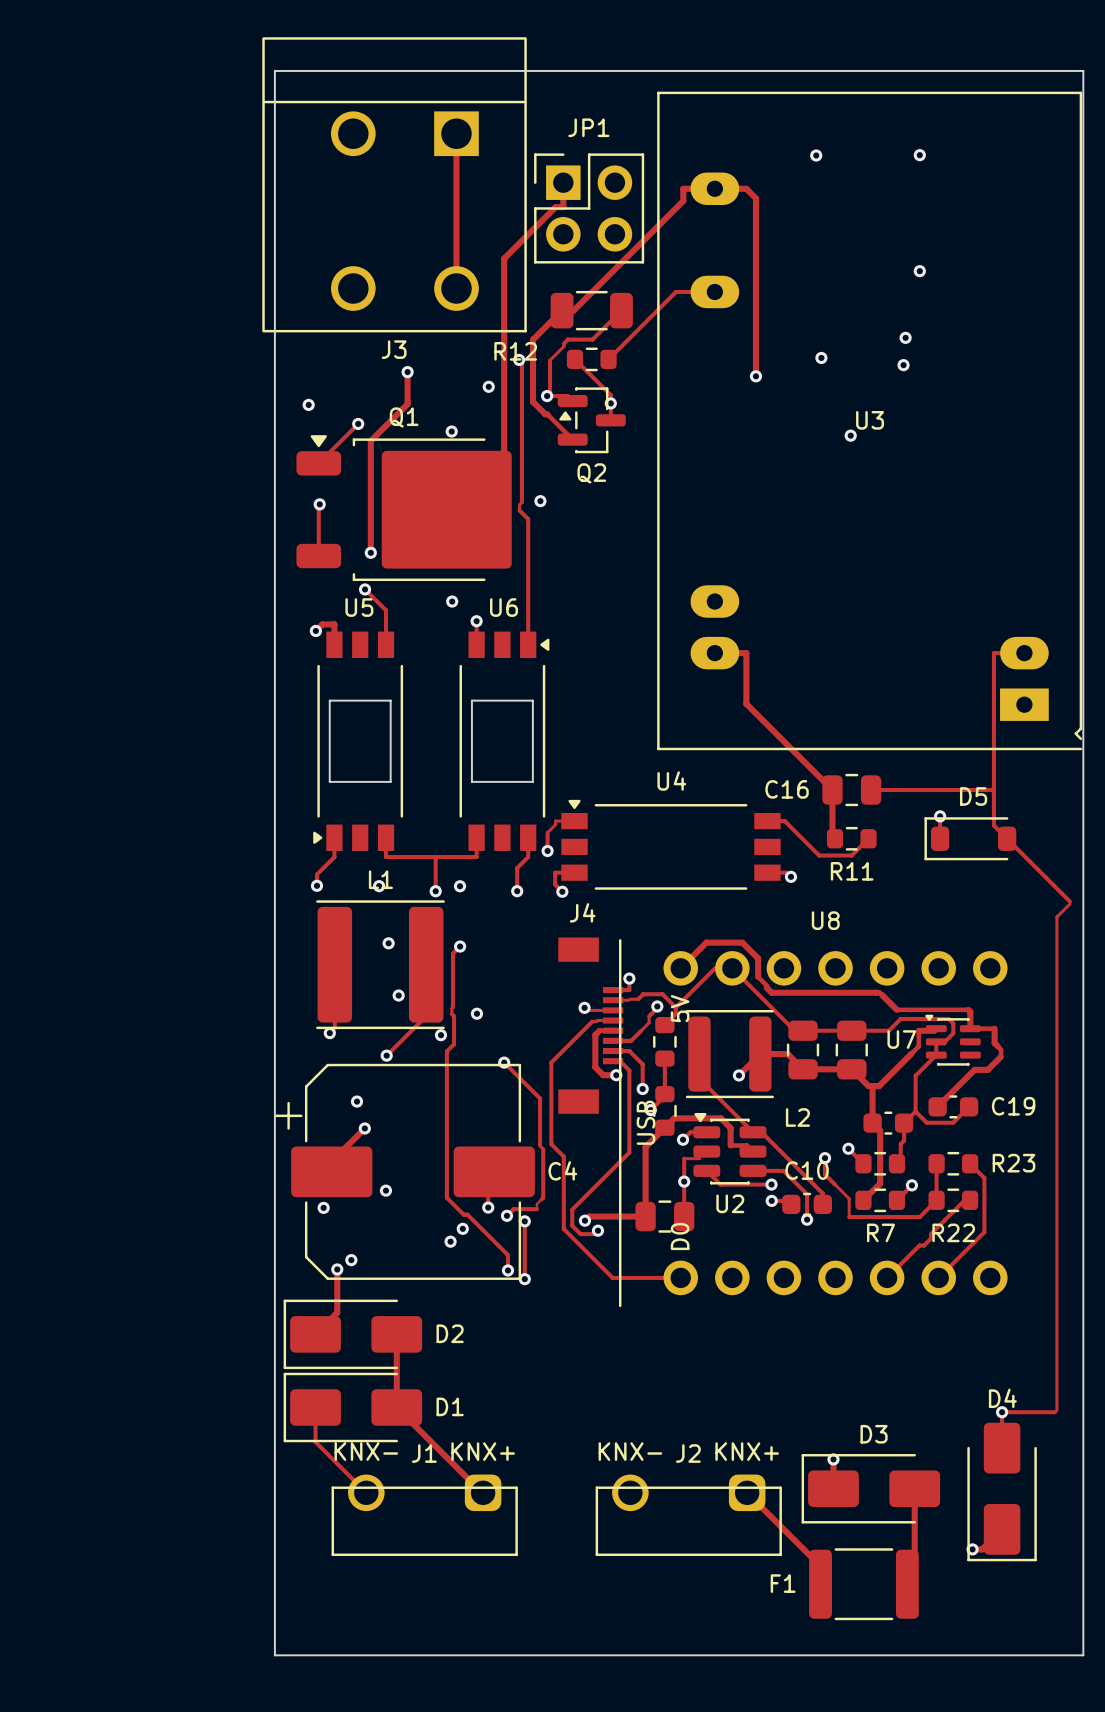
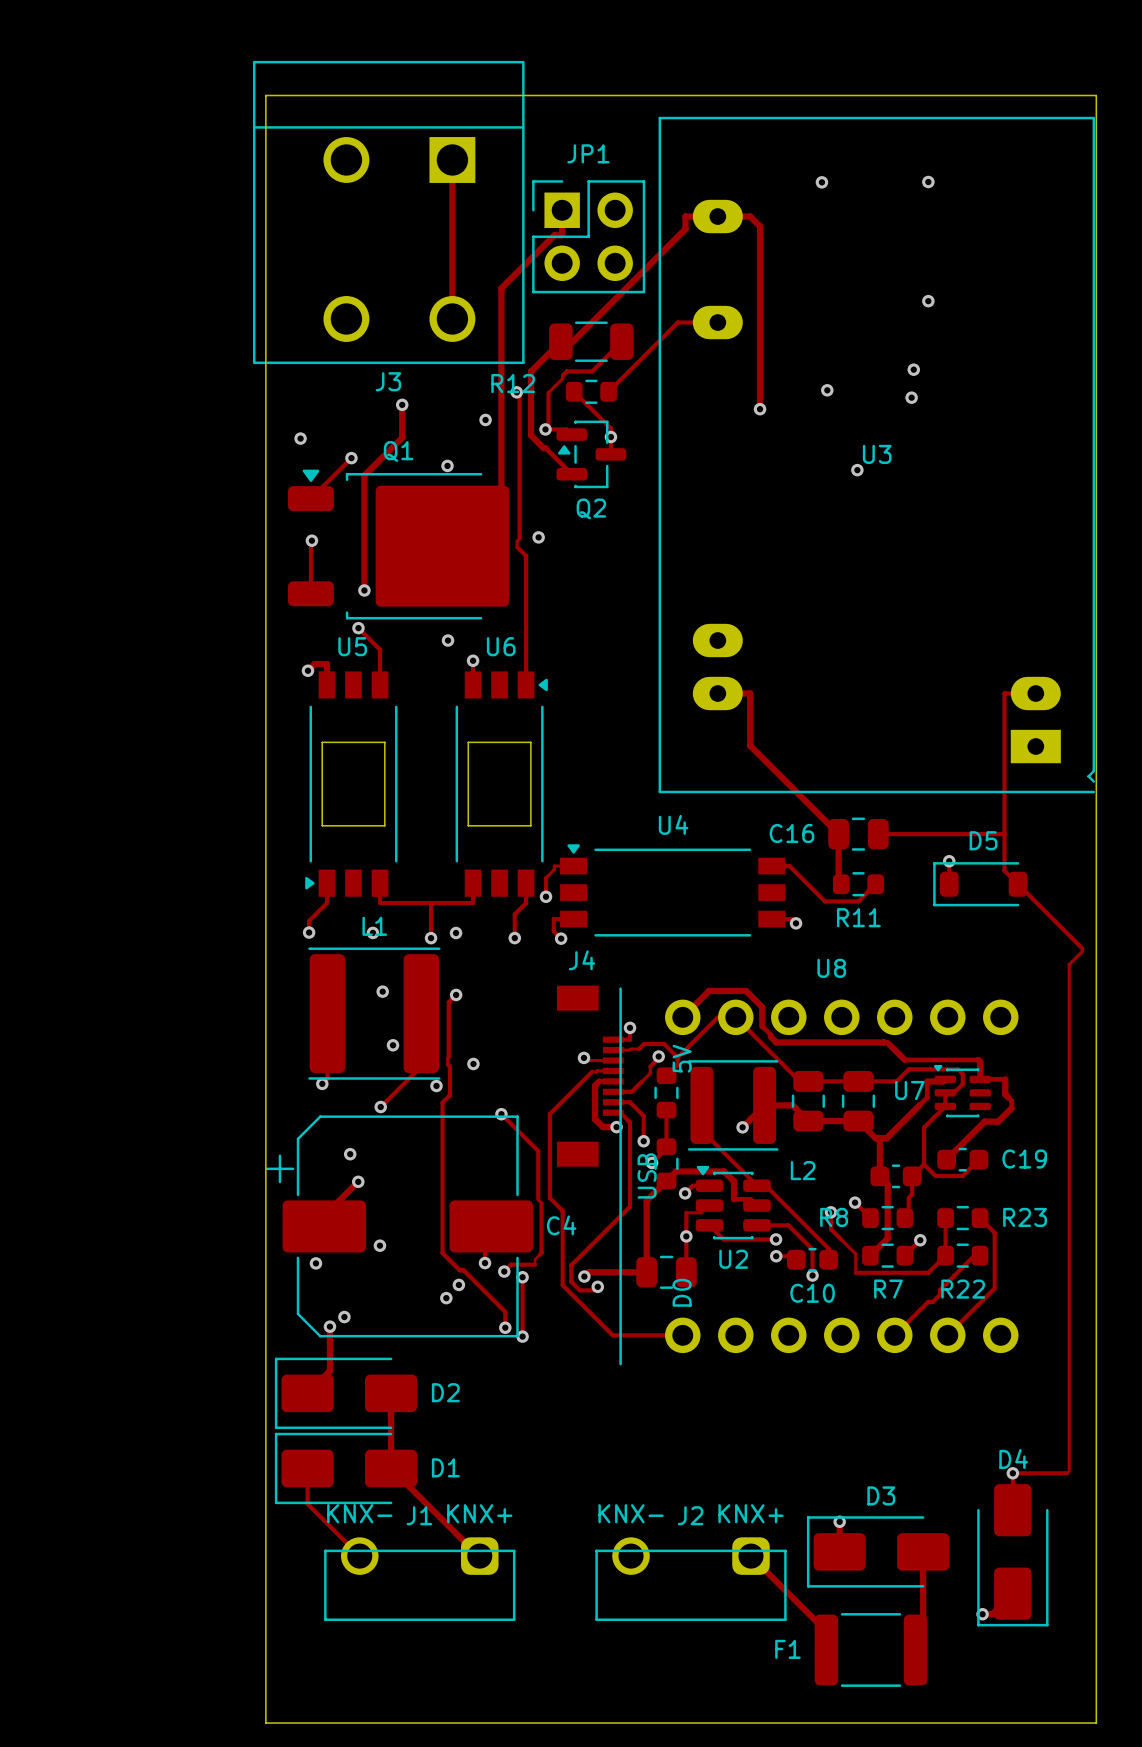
R8 name: none -> R8 (834, 1217)
C10 name position: C10 (807, 1170) -> C10 (812, 1293)

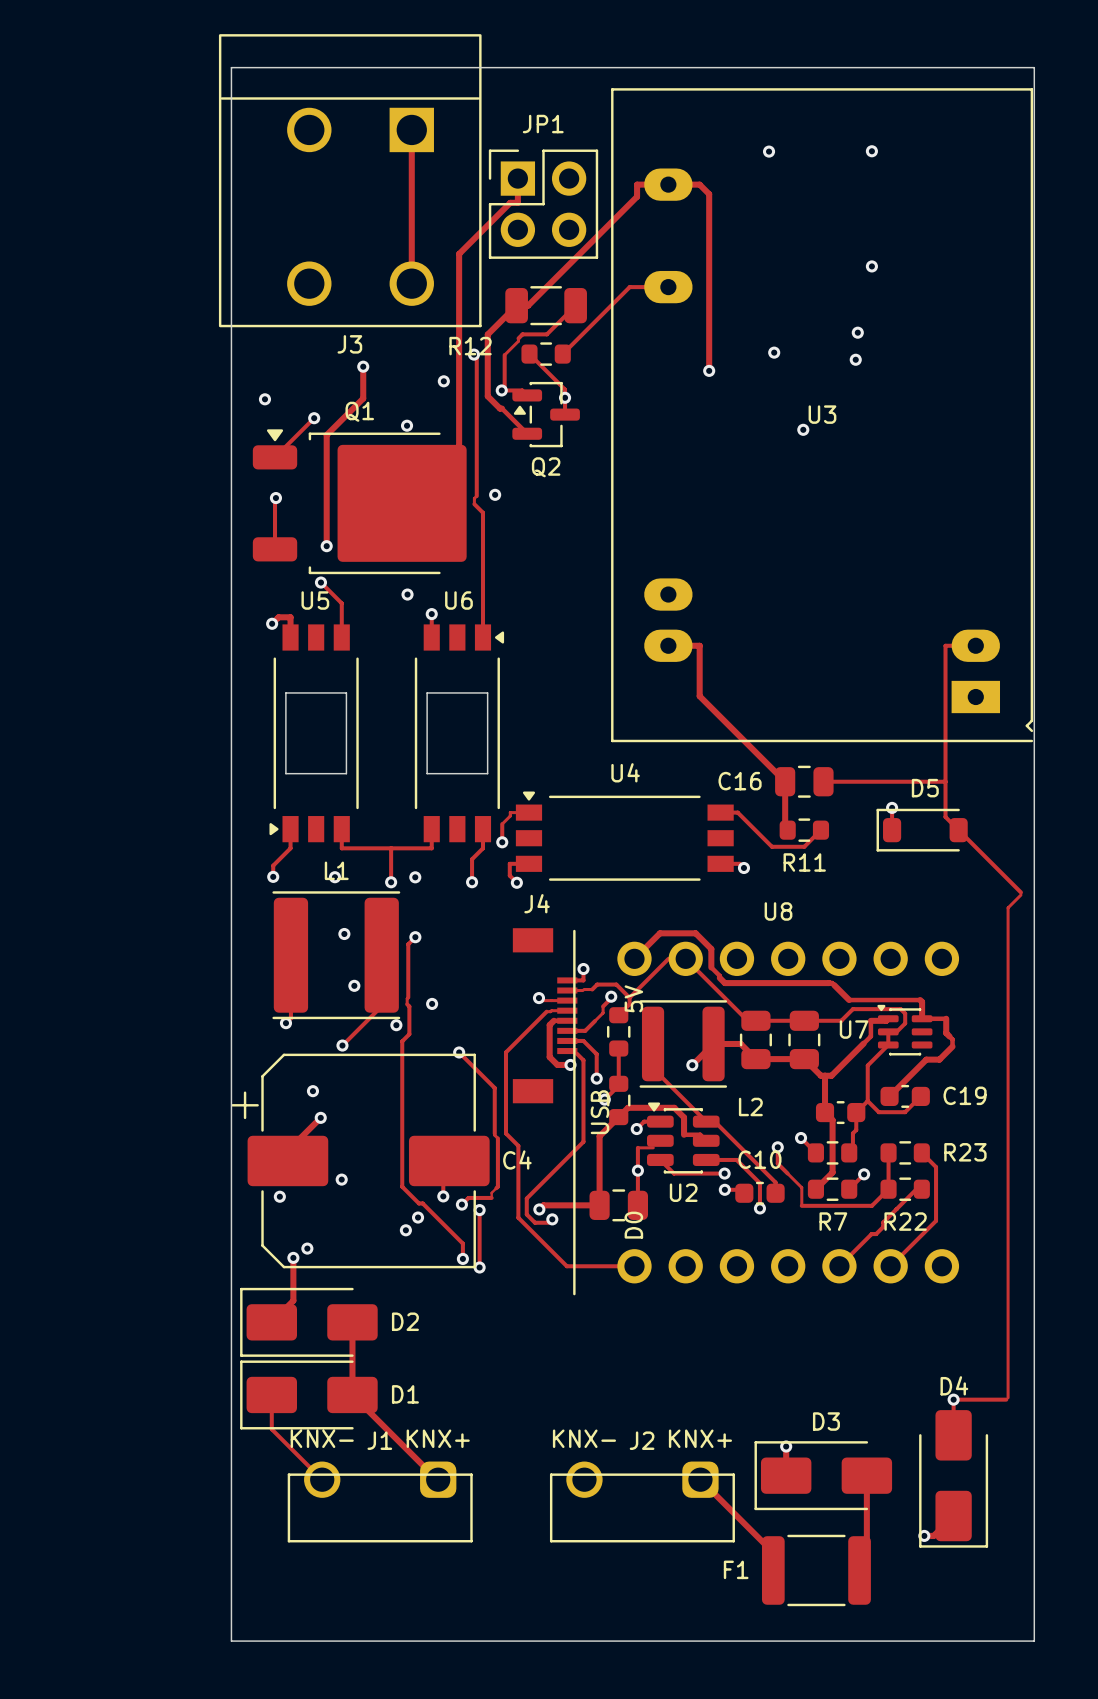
R8 name: R8 (834, 1217) -> none
C10 name position: C10 (812, 1293) -> C10 (759, 1159)

